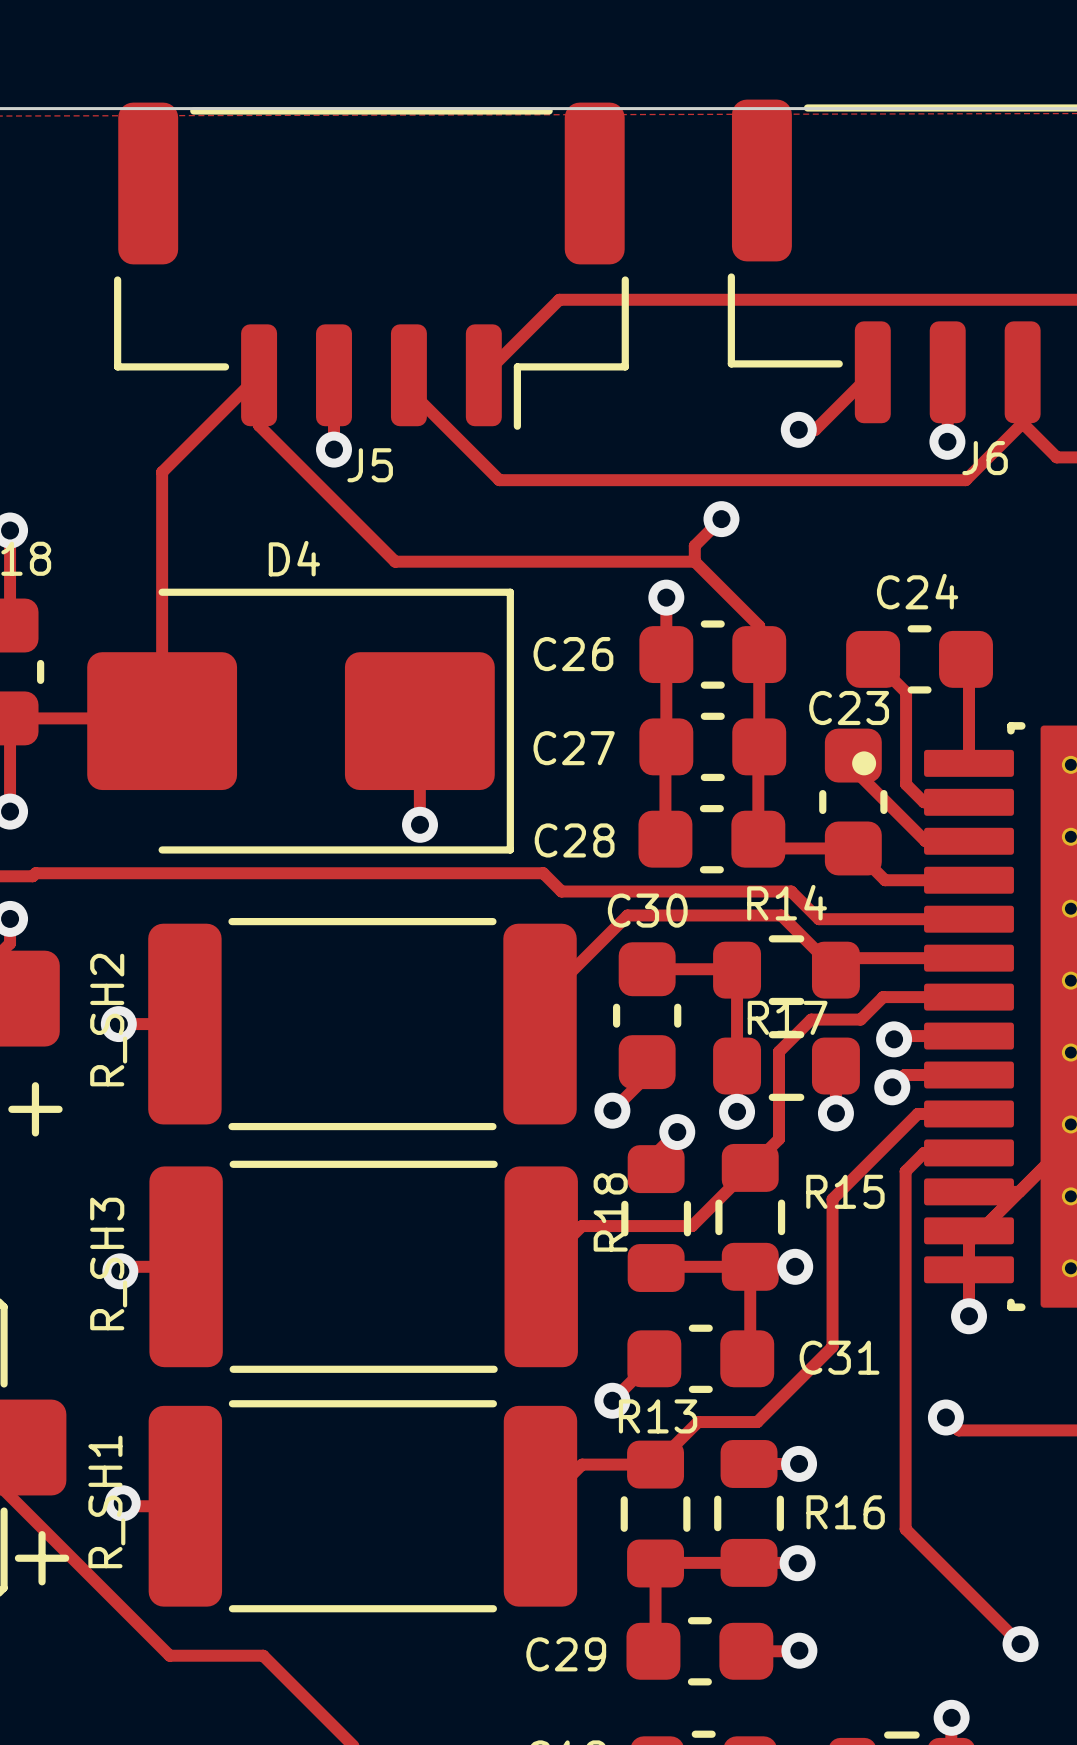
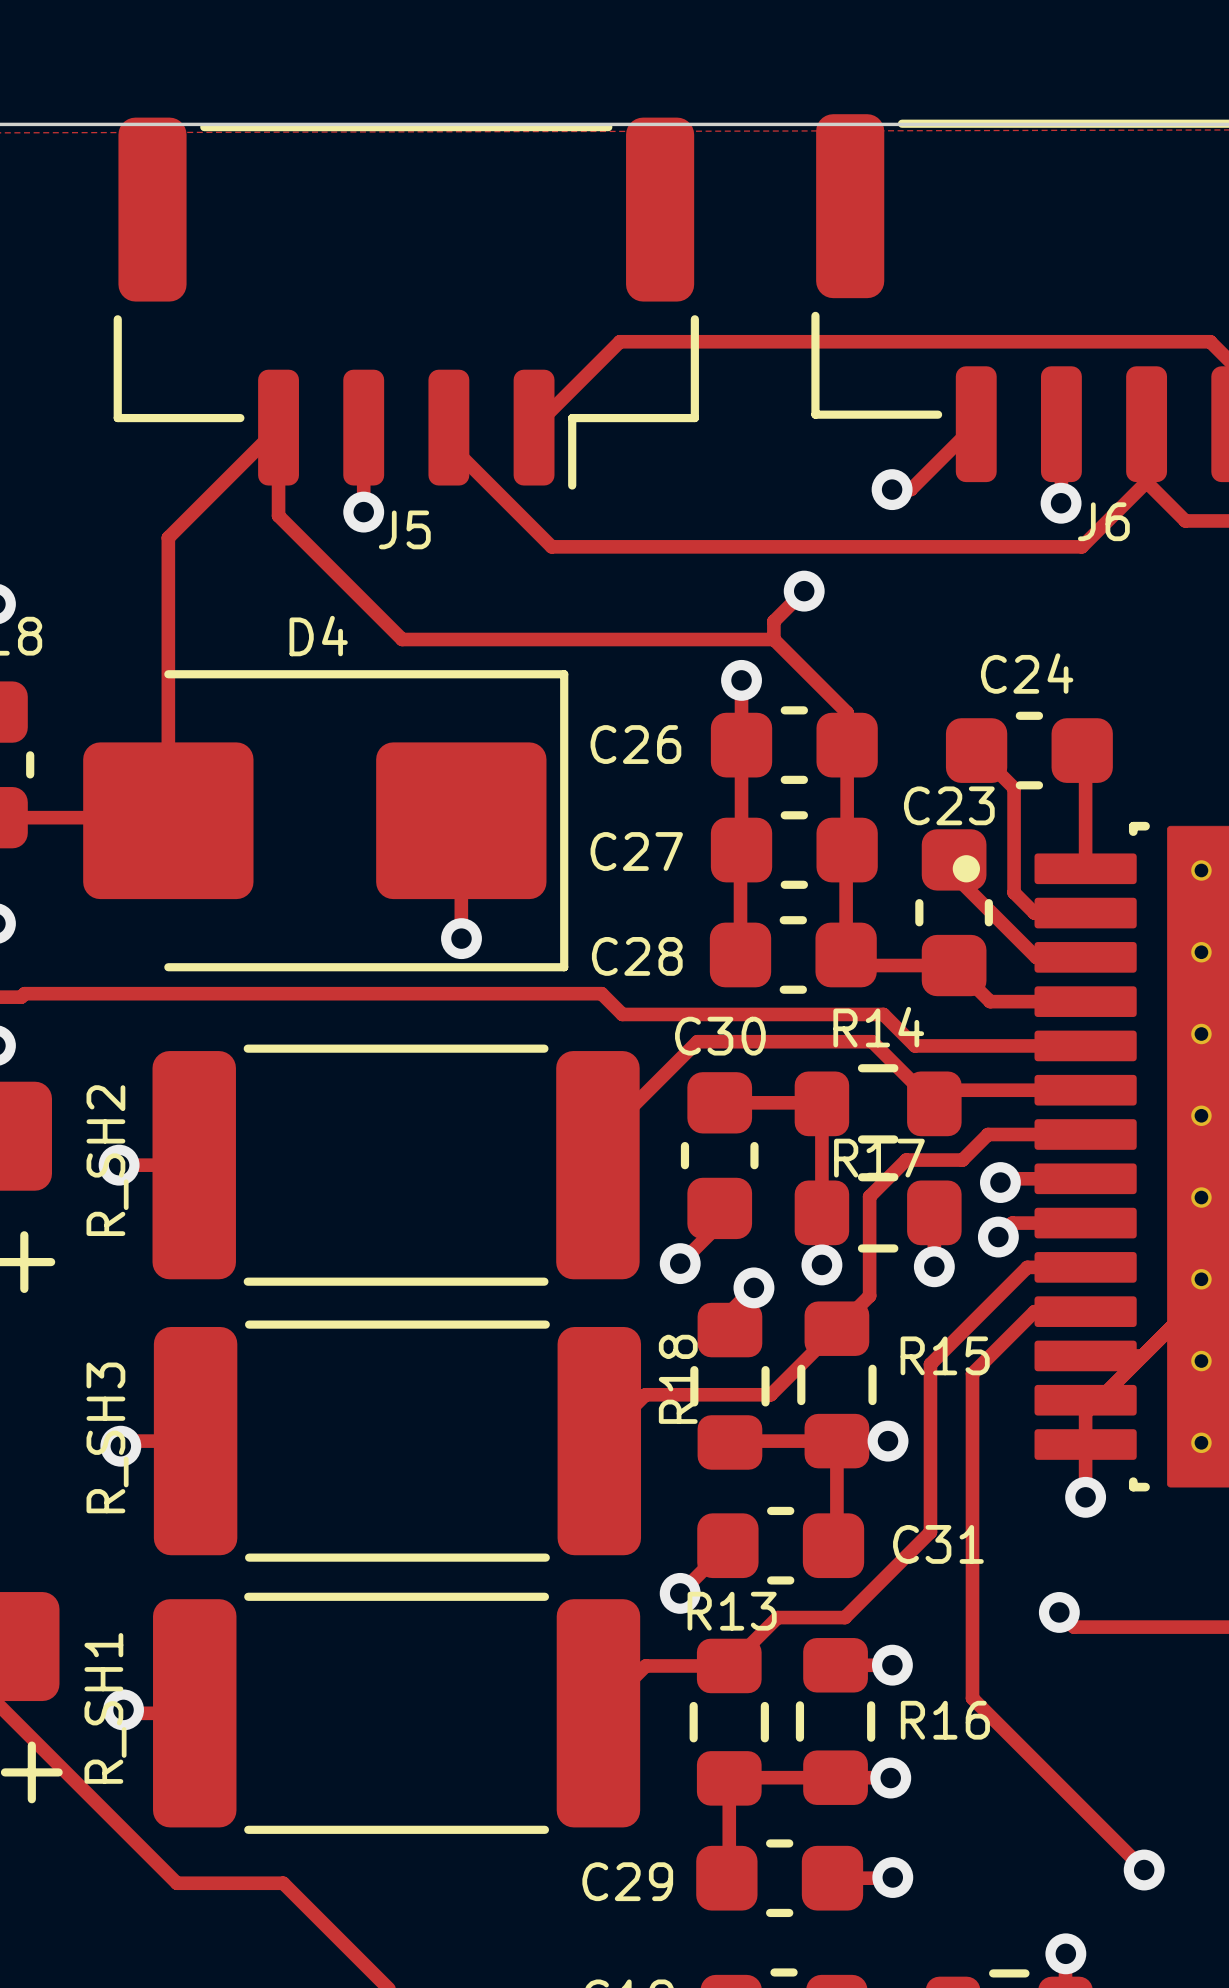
track: (259, 425) (395, 561) -> (278, 484) (278, 515) (402, 639) (433, 639)
track: (905, 1171) (905, 1529) -> (1013, 1332) (972, 1373) (972, 1698) (1013, 1739)

